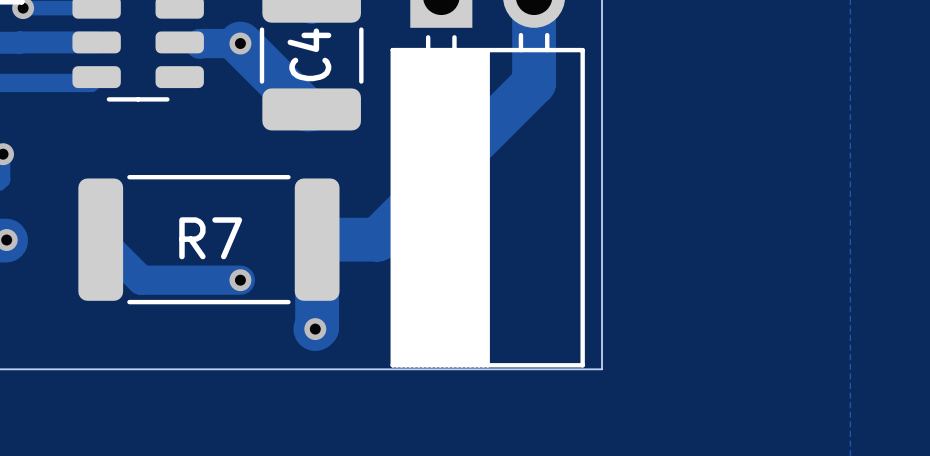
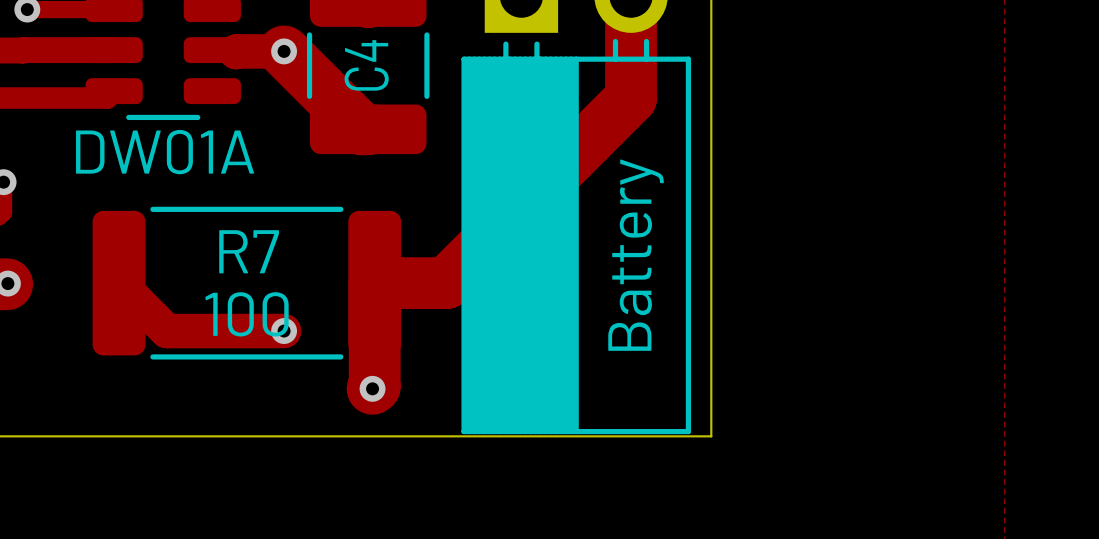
part value: none -> DW01A (165, 152)
part value: none -> Battery (636, 255)
R7 name position: R7 (210, 238) -> R7 (249, 251)
R7 value: none -> 100 (247, 314)

